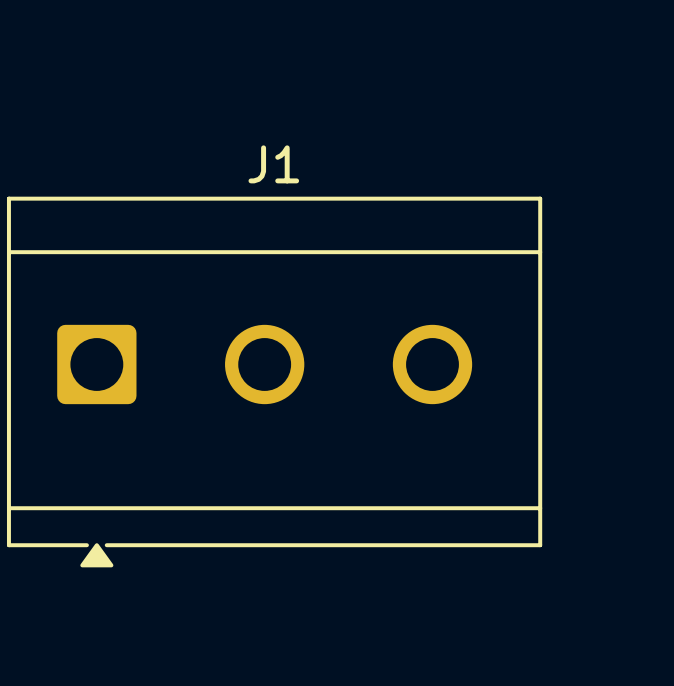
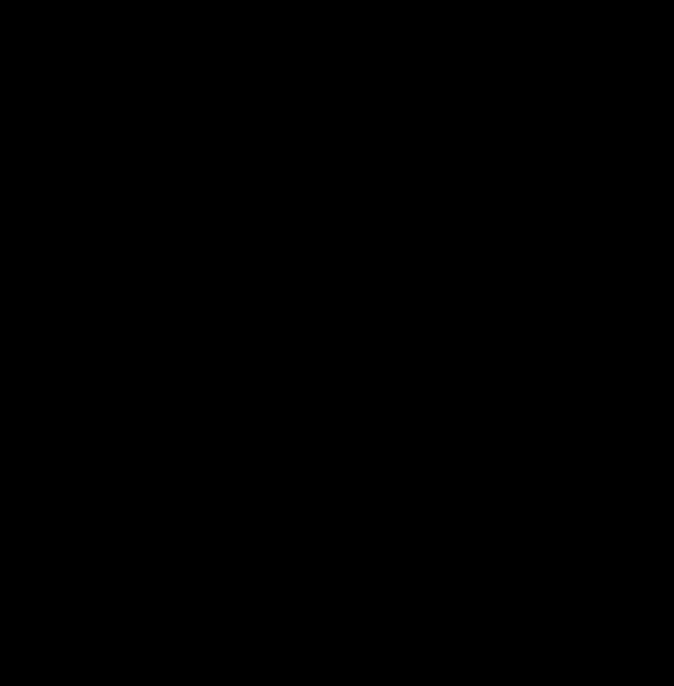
J1: (274, 382) -> none

